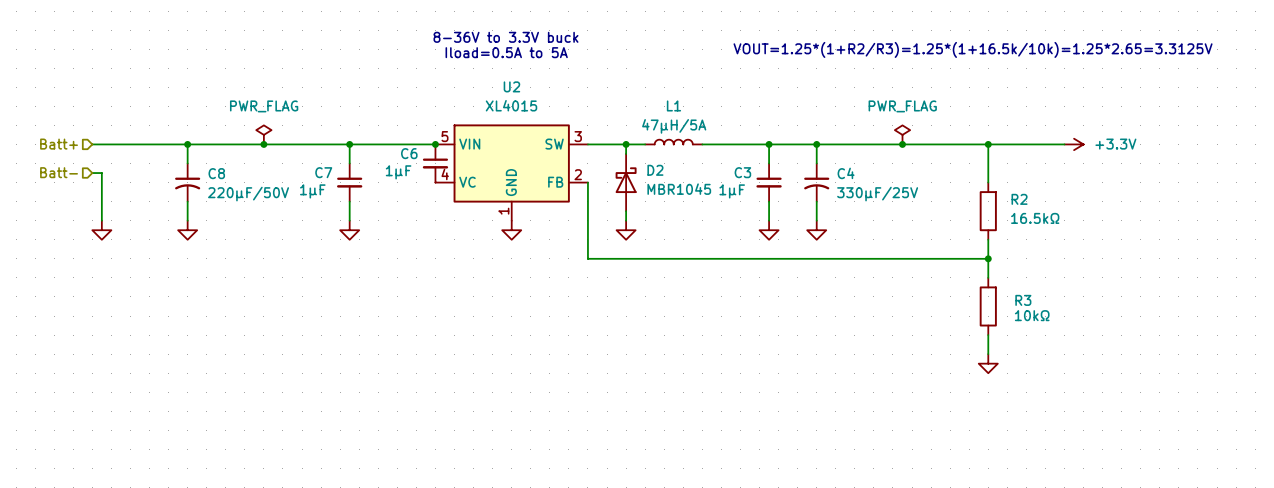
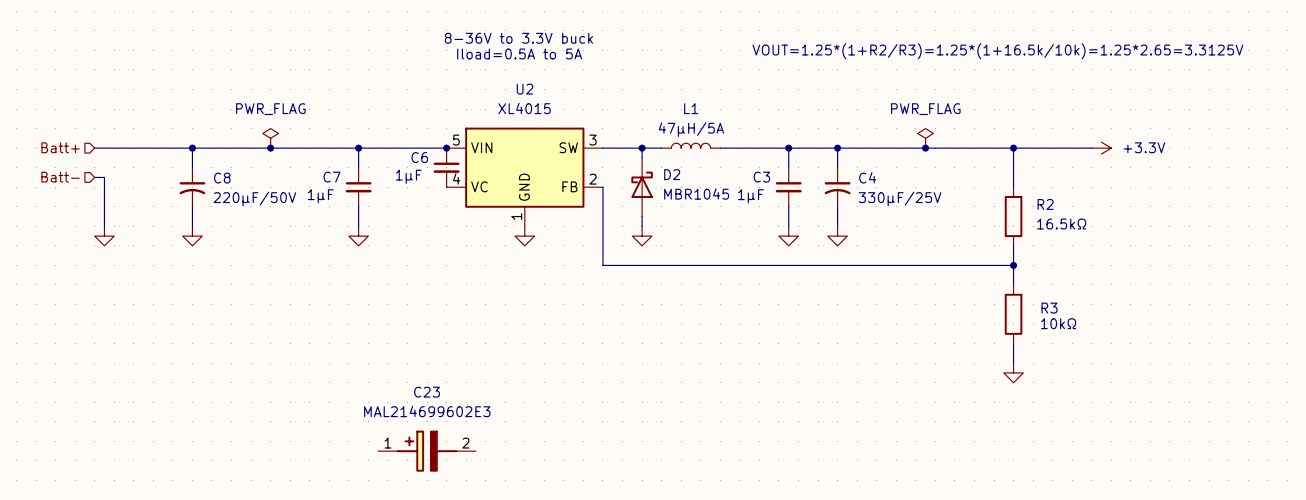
C23: none -> MAL214699602E3 (427, 451)

